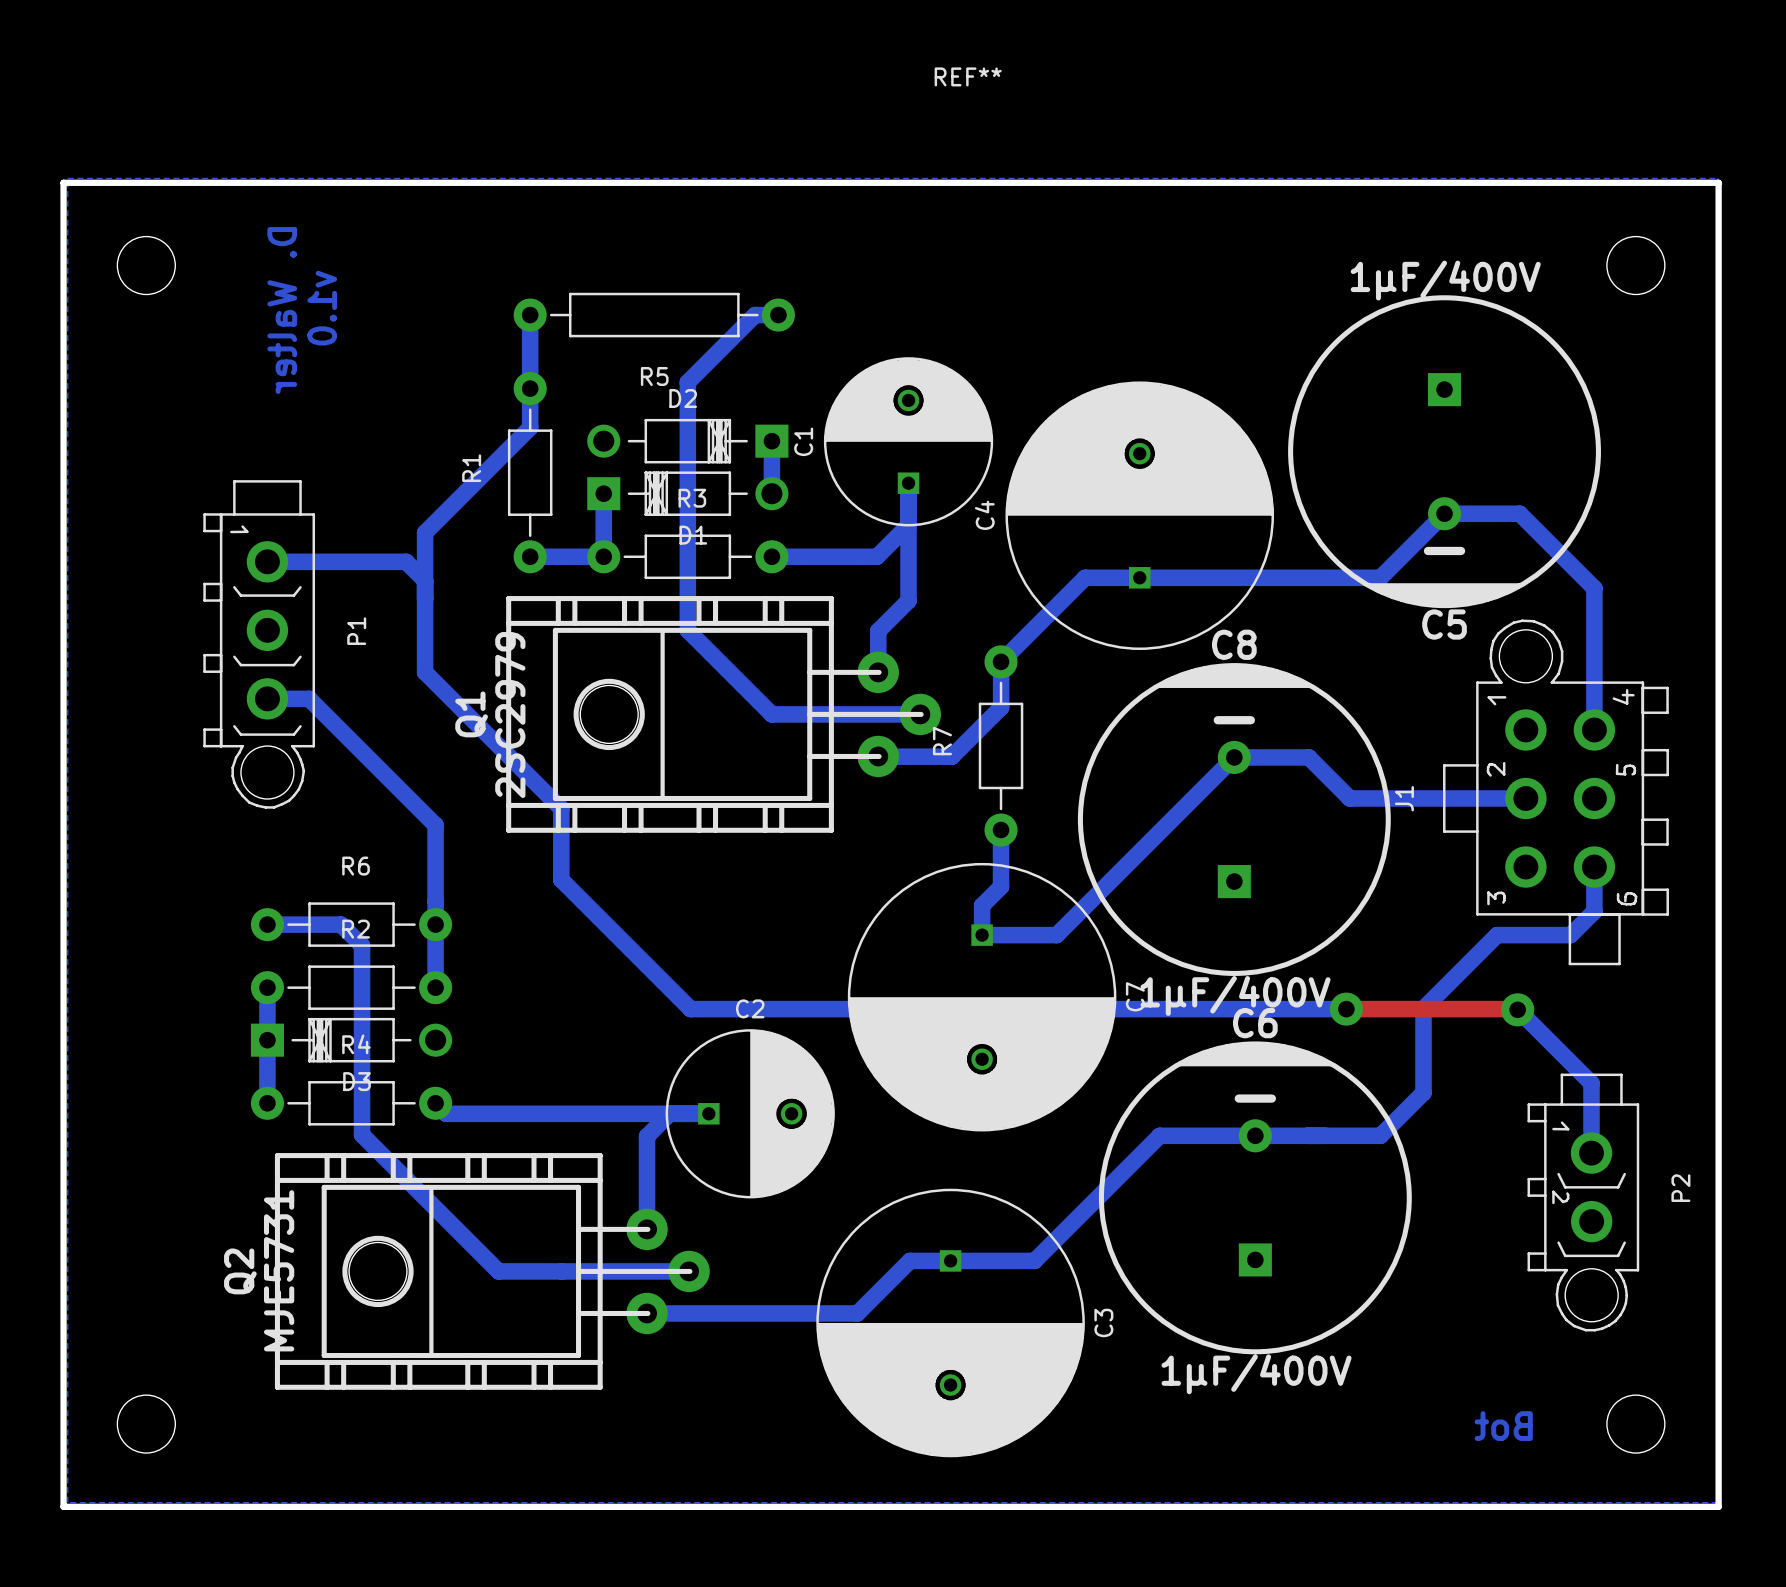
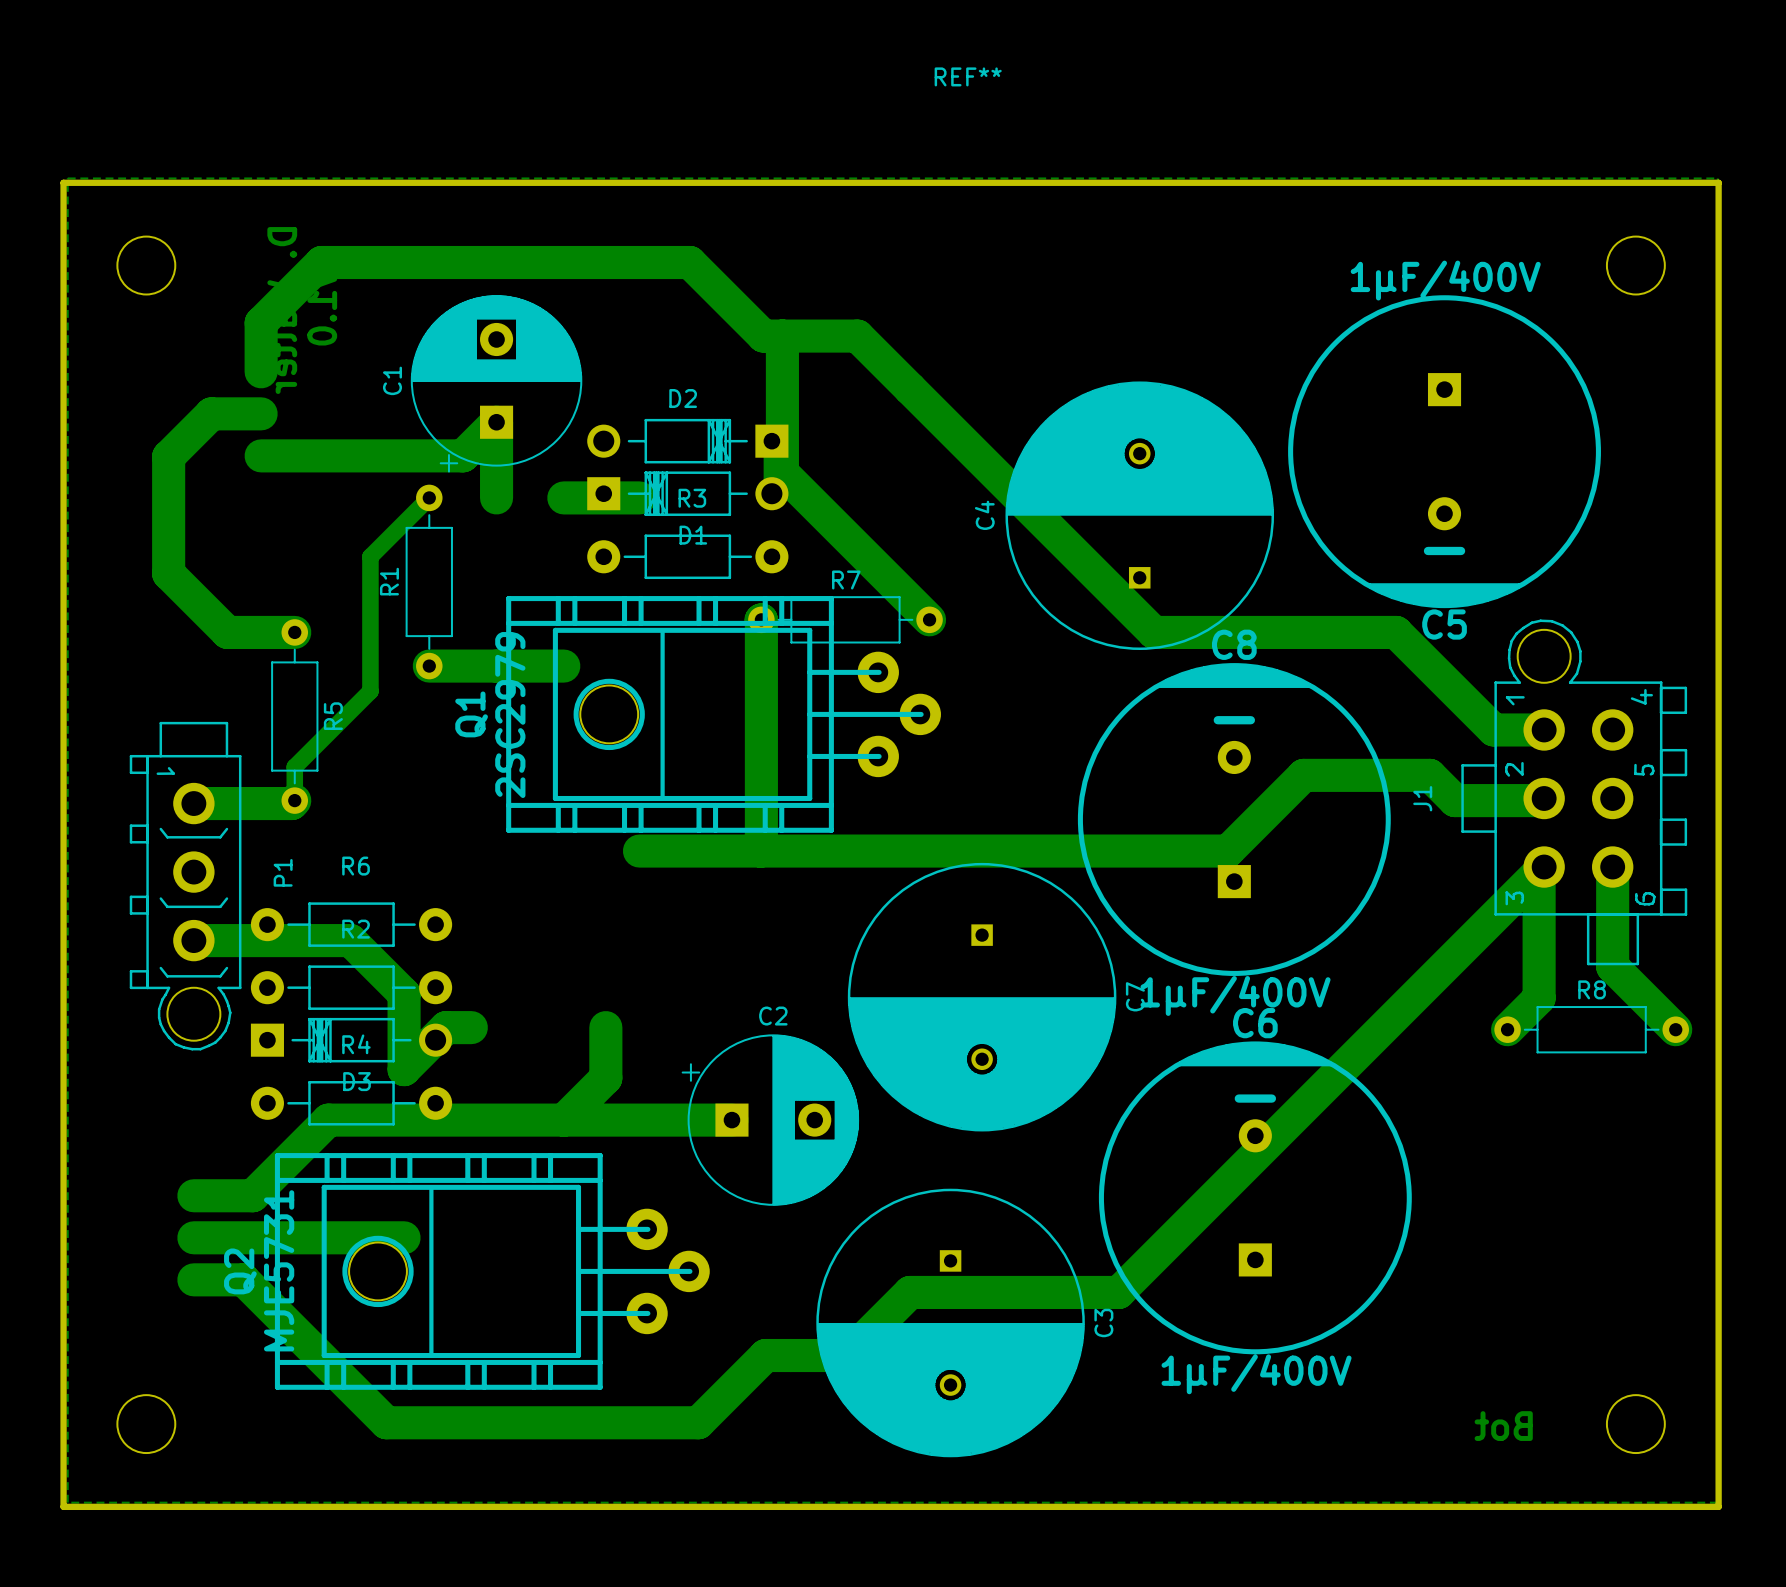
R5 footprint: [513, 292, 795, 338] -> [271, 619, 319, 814]
bottom track: (530, 315) (530, 427) (425, 532) (425, 672) (561, 808) (561, 879) (690, 1009) (1346, 1009) -> none
bottom track: (778, 315) (755, 315) (687, 382) (687, 630) (771, 714) (920, 714) -> none
bottom track: none -> (782, 336) (782, 472) (929, 619)
C1 footprint: [823, 357, 994, 527] -> [410, 295, 583, 473]
bottom track: none -> (261, 371) (261, 322) (321, 262) (689, 262) (763, 336) (857, 336) (1153, 632) (1396, 632) (1493, 729) (1544, 729)
R1 footprint: [507, 372, 553, 574] -> [405, 484, 453, 680]
R5 name position: R5 (654, 376) -> R5 (333, 716)
bottom track: none -> (261, 413) (211, 413) (168, 456) (168, 573) (227, 632) (294, 632)
bottom track: none -> (261, 455) (462, 455) (496, 422) (496, 497)
bottom track: (908, 483) (908, 600) (878, 631) (877, 672) -> none
bottom track: (603, 493) (603, 556) (530, 556) -> none
bottom track: none -> (429, 497) (370, 556) (370, 691) (294, 766) (294, 800) (291, 803) (193, 803)
bottom track: none -> (563, 497) (639, 497)
bottom track: (908, 525) (877, 556) (771, 556) -> none
bottom track: (267, 561) (406, 561) (425, 580) -> none
bottom track: none -> (760, 620) (760, 851)
P1 position: (259, 644) -> (185, 886)
R7 footprint: [978, 645, 1024, 847] -> [748, 596, 943, 644]
bottom track: (1001, 661) (1085, 577) (1380, 577) (1444, 513) (1519, 513) (1594, 588) (1594, 729) -> none
bottom track: (1001, 661) (1001, 707) (951, 756) (878, 756) -> none
bottom track: none -> (429, 666) (563, 666)
bottom track: (267, 698) (309, 698) (435, 825) (435, 987) -> none
R7 name position: R7 (942, 741) -> R7 (846, 579)
J1 position: (1555, 792) -> (1574, 792)
bottom track: (1525, 798) (1349, 798) (1308, 757) (1234, 757) (1056, 935) (982, 935) (982, 905) (1001, 886) (1001, 830) -> none
bottom track: none -> (1544, 798) (1542, 800) (1455, 800) (1429, 775) (1303, 775) (1228, 851) (639, 851)
bottom track: none -> (1544, 867) (1118, 1292) (910, 1292) (847, 1355) (765, 1355) (698, 1422) (386, 1422) (243, 1279) (193, 1279)
bottom track: (1594, 867) (1594, 911) (1570, 935) (1497, 935) (1423, 1008) (1423, 1092) (1380, 1135) (1159, 1135) (1034, 1260) (909, 1260) (857, 1313) (647, 1313) -> none
bottom track: none -> (1612, 867) (1612, 966) (1675, 1029)
bottom track: none -> (1539, 872) (1539, 998) (1507, 1029)
bottom track: (267, 924) (341, 924) (362, 945) (362, 1134) (498, 1271) (689, 1271) -> none
bottom track: none -> (193, 940) (350, 940) (404, 993) (404, 1069) (446, 1027) (471, 1027)
bottom track: (267, 987) (267, 1103) -> none
top track: (1346, 1009) (1517, 1009) -> none
via: (1346, 1009) -> none
bottom track: (1517, 1009) (1591, 1083) (1591, 1153) -> none
via: (1517, 1009) -> none
bottom track: none -> (605, 1027) (605, 1078) (563, 1120)
C2 footprint: [665, 1029, 835, 1199] -> [681, 1034, 860, 1206]
R8: none -> (1591, 1029)
bottom track: (435, 1103) (446, 1113) (708, 1113) -> none
bottom track: (669, 1113) (647, 1136) (647, 1229) (645, 1228) -> none
bottom track: none -> (731, 1120) (328, 1120) (252, 1195) (193, 1195)
P2: (1583, 1202) -> none
bottom track: none -> (193, 1237) (404, 1237)

